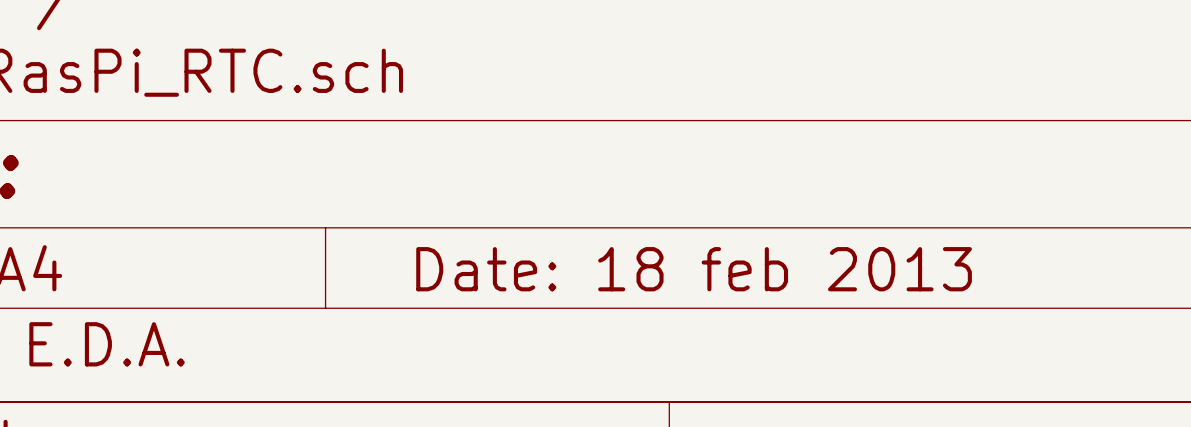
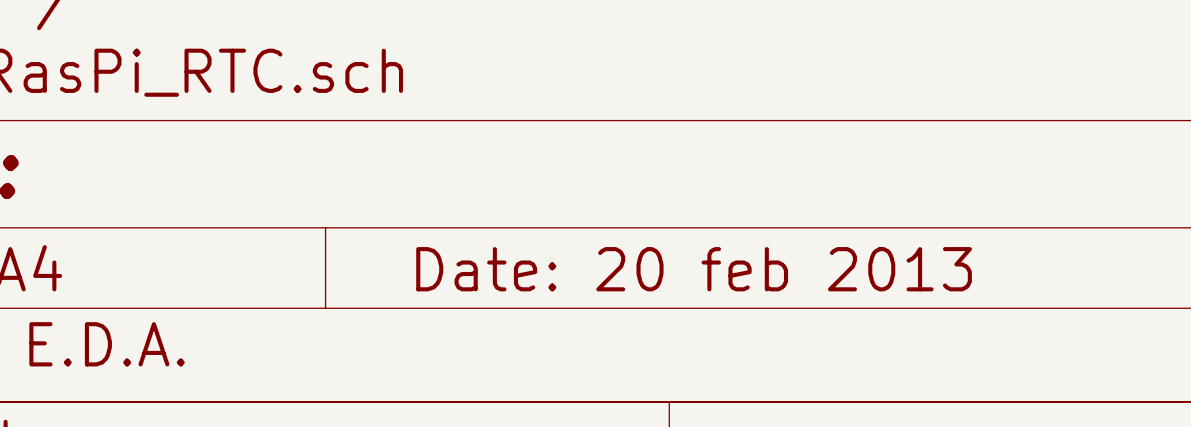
title block: Date: 18 feb 2013 (694, 269) -> Date: 20 feb 2013 (694, 269)

